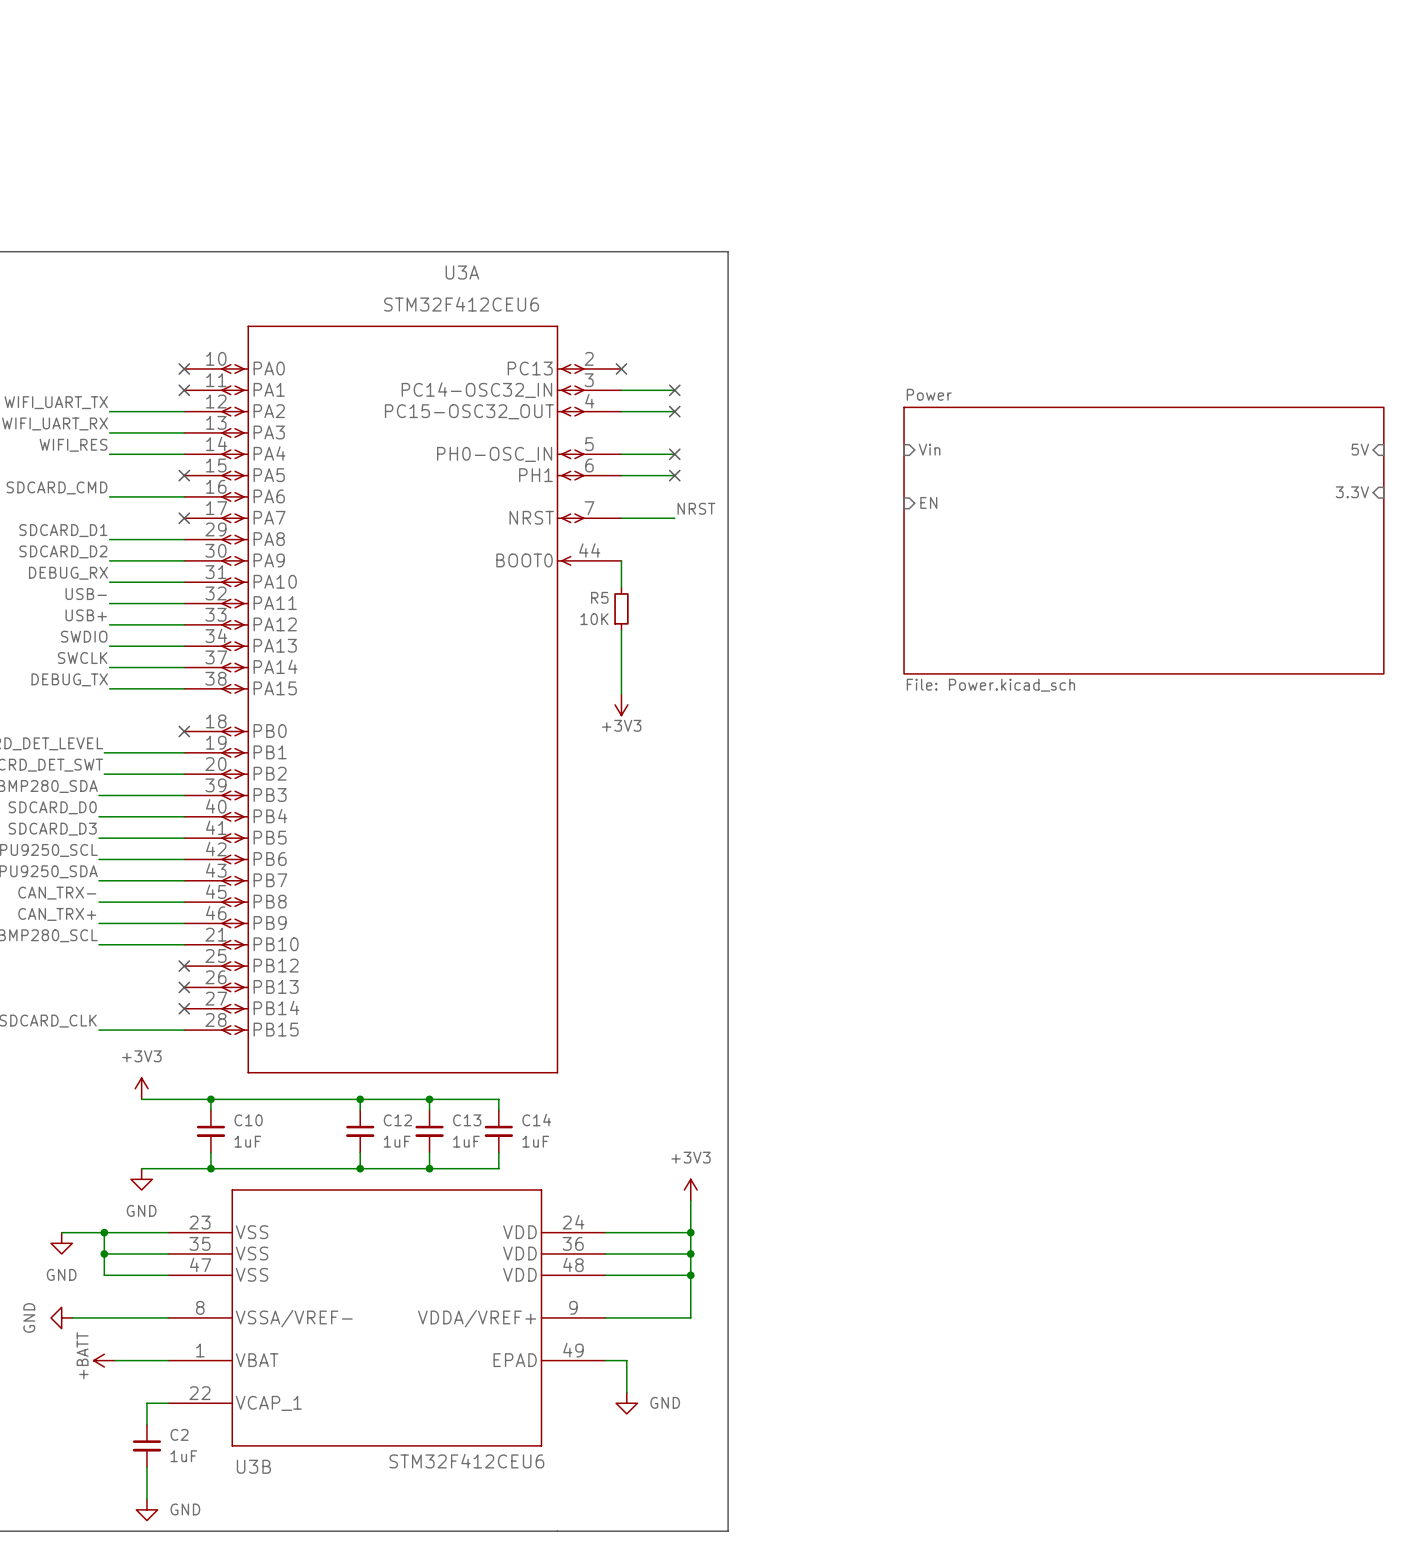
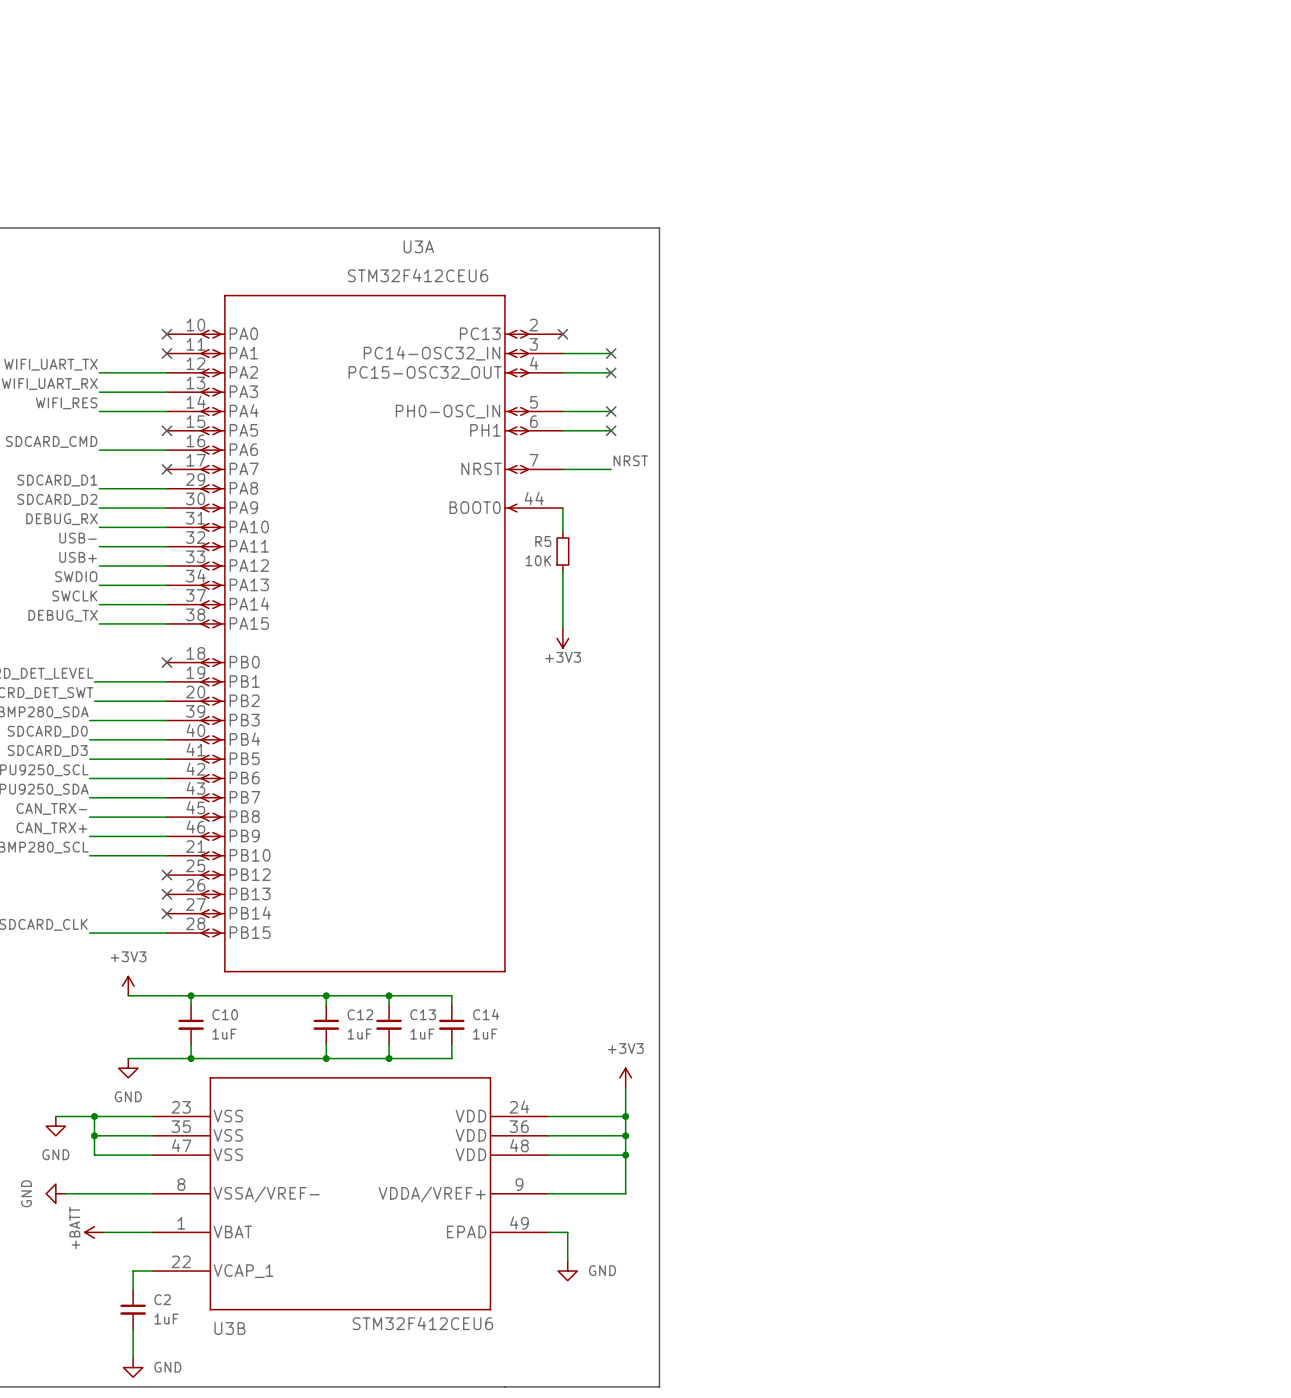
sheet pin: Vin (929, 449) -> none
sheet pin: 5V (1360, 449) -> none
sheet pin: 3.3V (1352, 492) -> none
sheet pin: EN (928, 502) -> none
sheet Power: File: Power.kicad_sch (1143, 540) -> none

